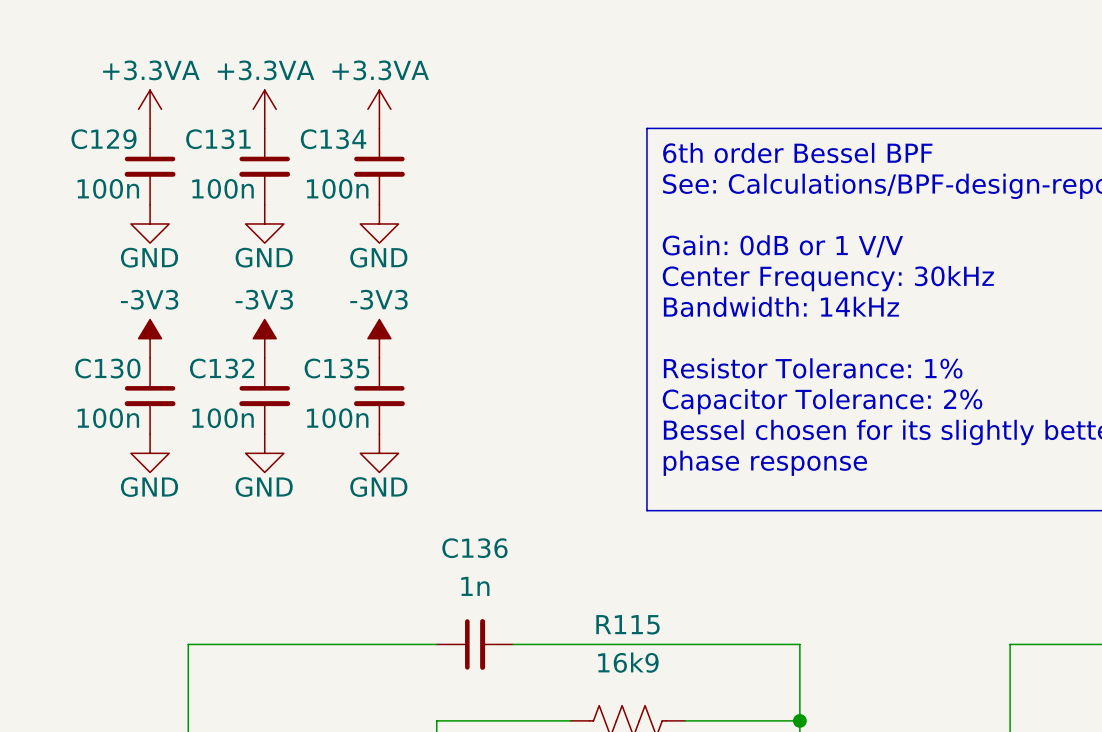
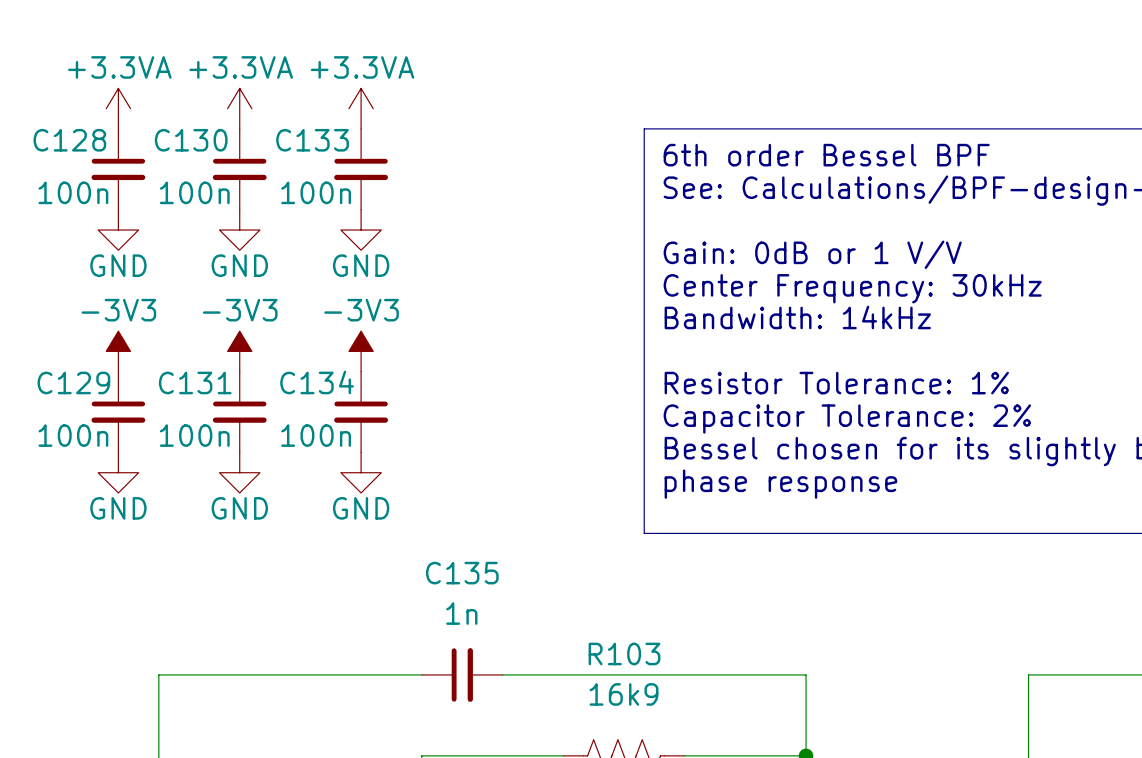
C129 name: C129 (104, 139) -> C128 (69, 140)
C131 name: C131 (218, 139) -> C130 (191, 140)
C134 name: C134 (333, 139) -> C133 (312, 140)
C130 name: C130 (107, 368) -> C129 (73, 382)
C132 name: C132 (222, 368) -> C131 (195, 382)
C135 name: C135 (336, 368) -> C134 (317, 382)
C136 name: C136 (474, 548) -> C135 (462, 573)
R115 name: R115 (628, 624) -> R103 (624, 653)

